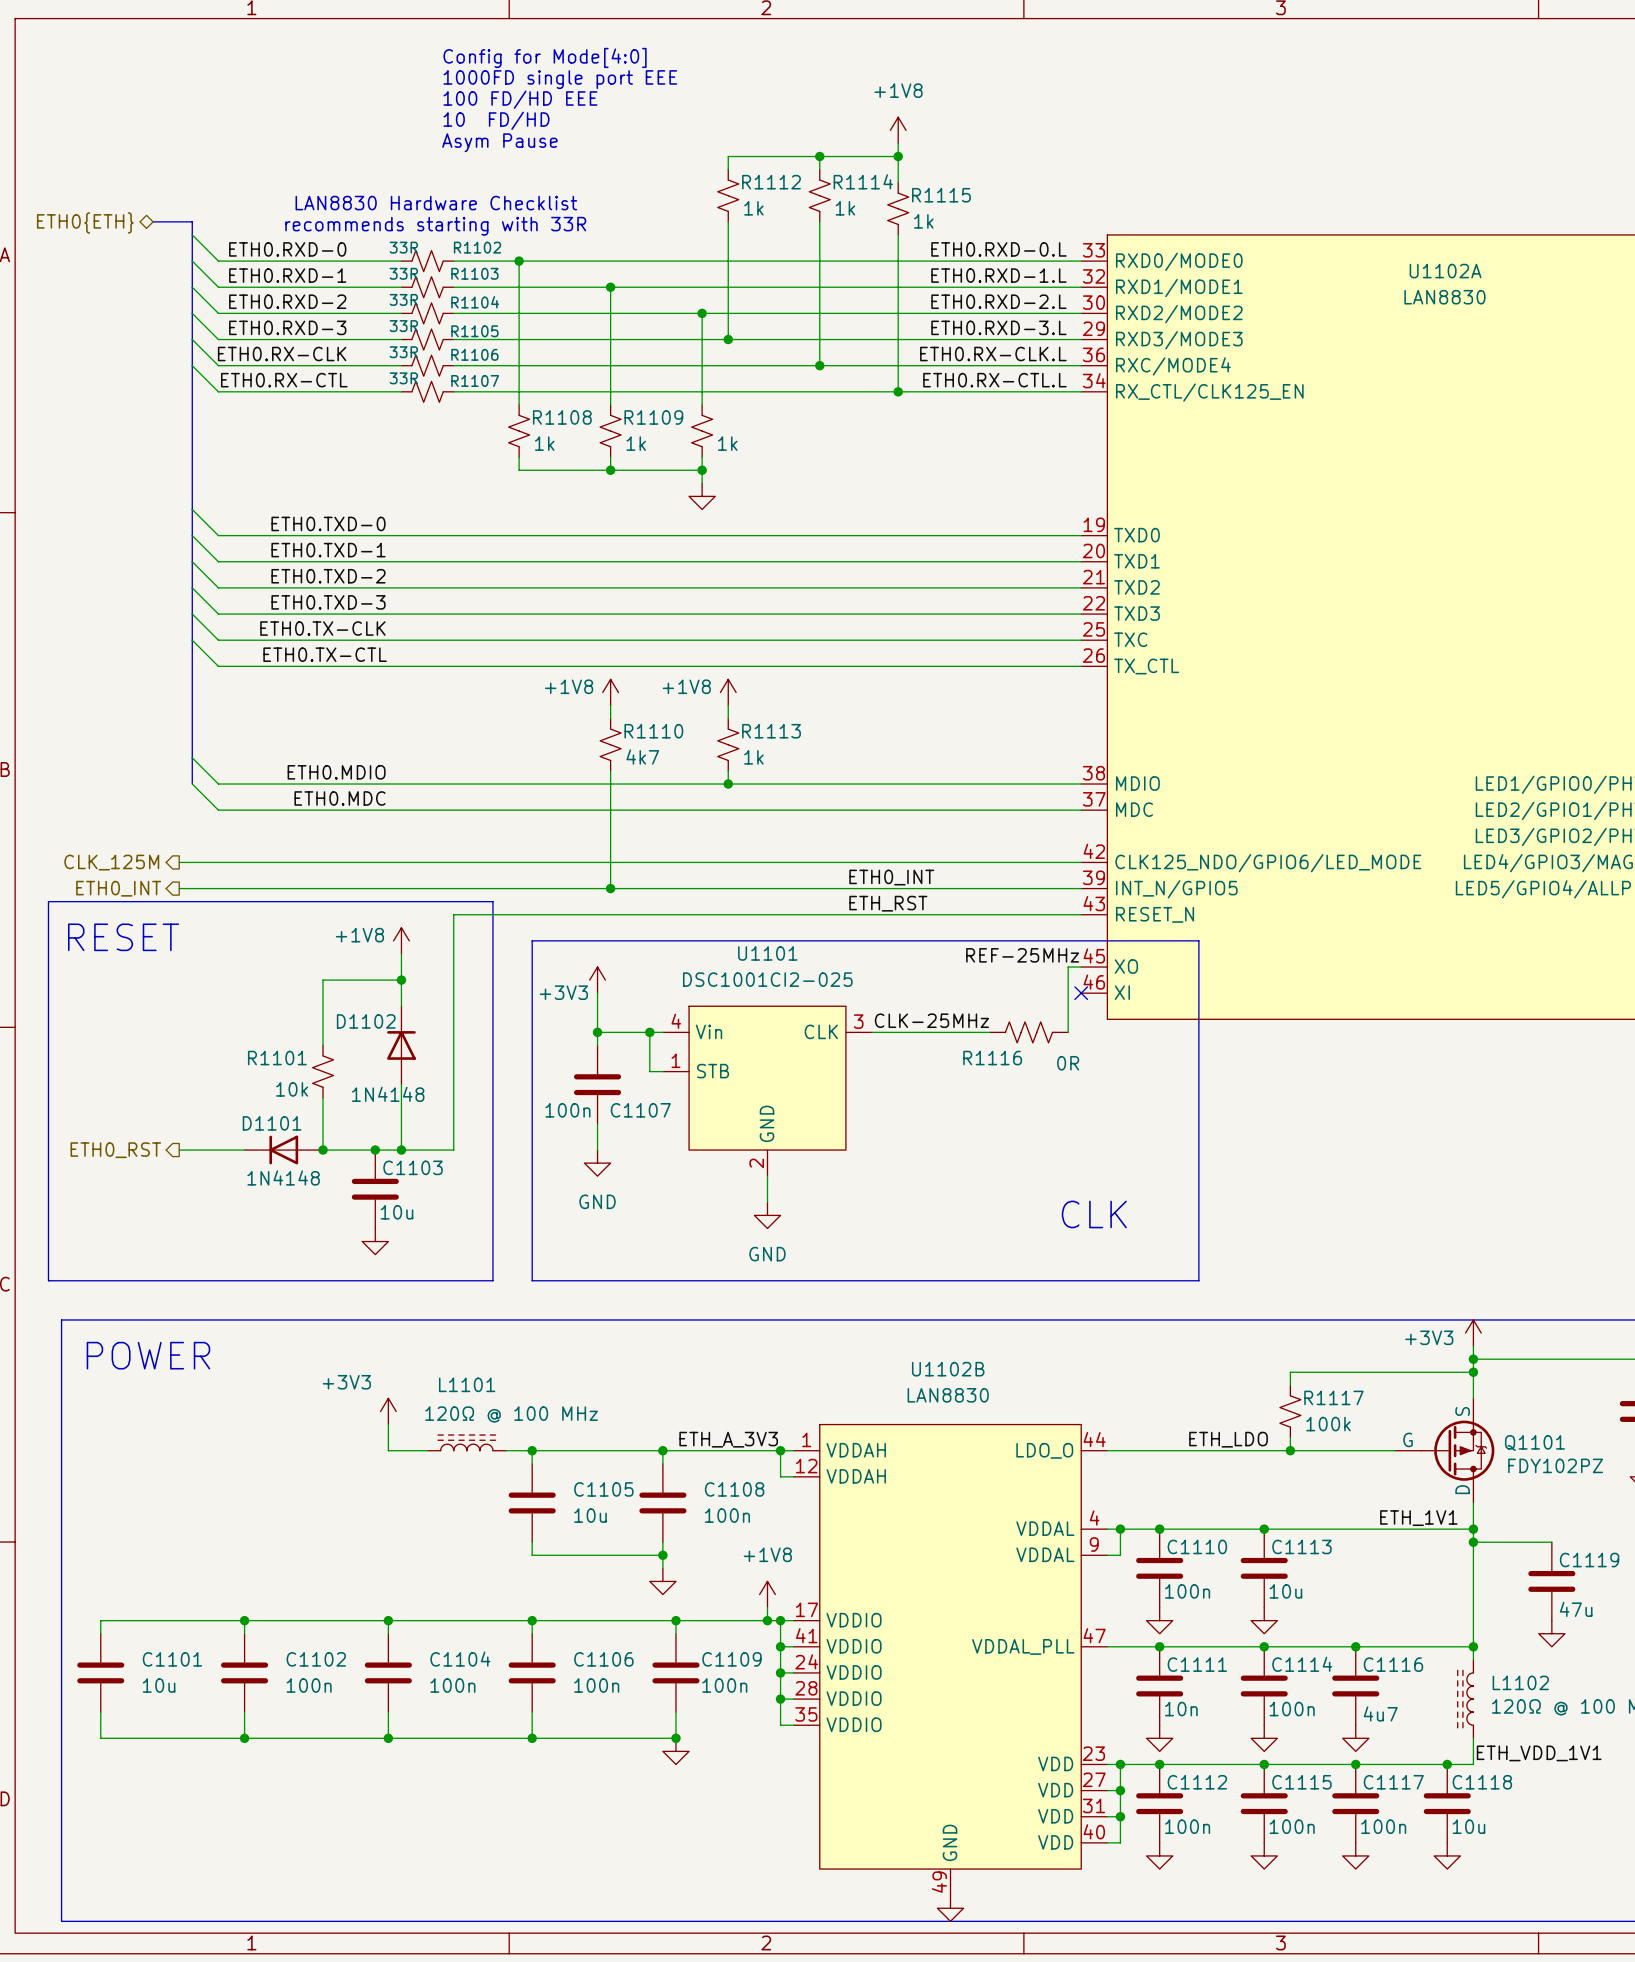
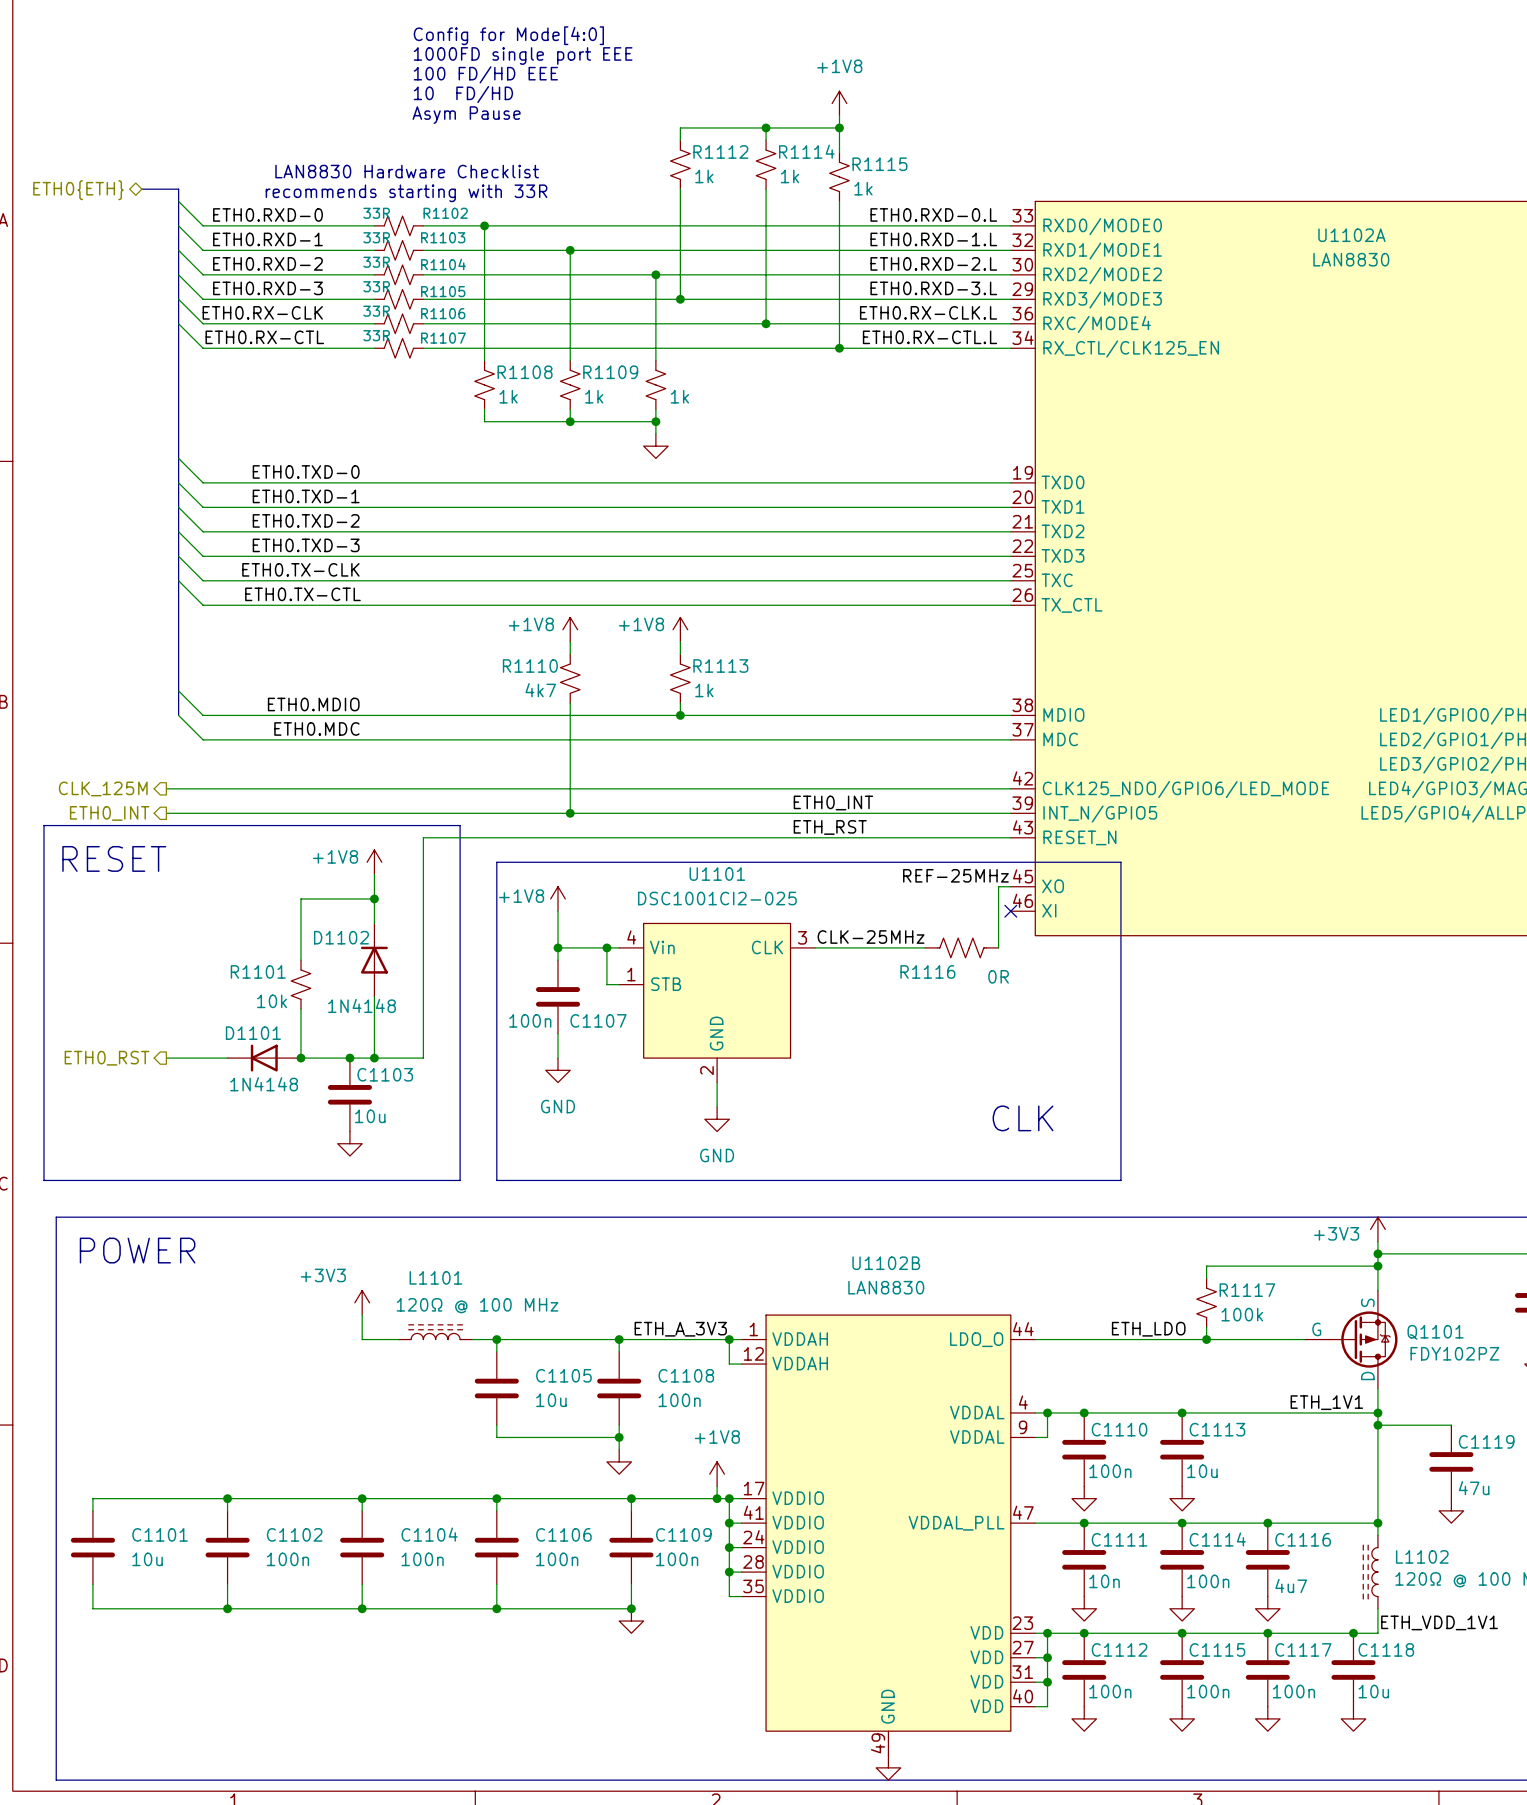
R1110 flip: as is (610, 744) -> left-right (570, 678)
power symbol: +3V3 (597, 980) -> +1V8 (558, 898)

